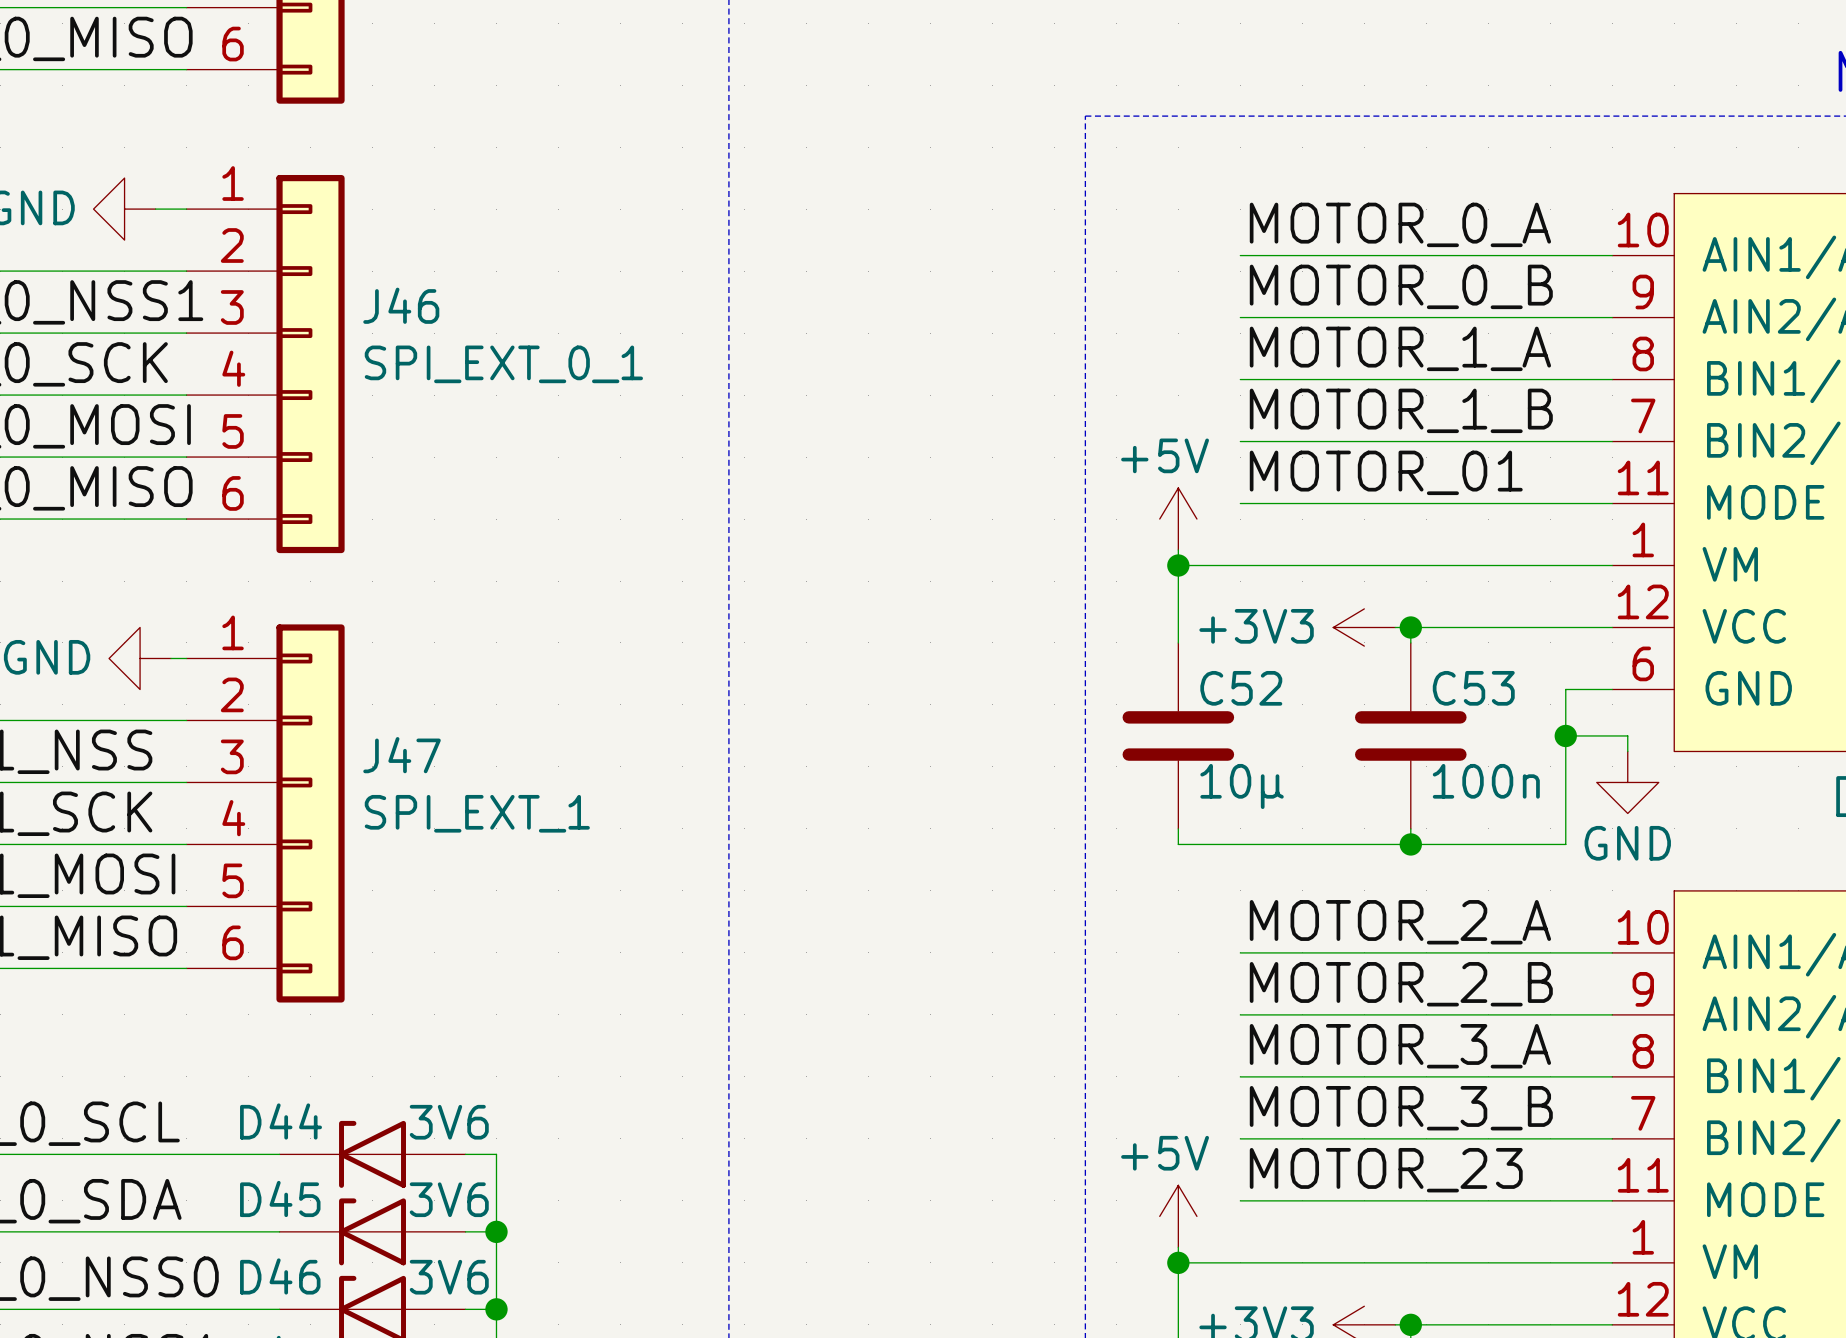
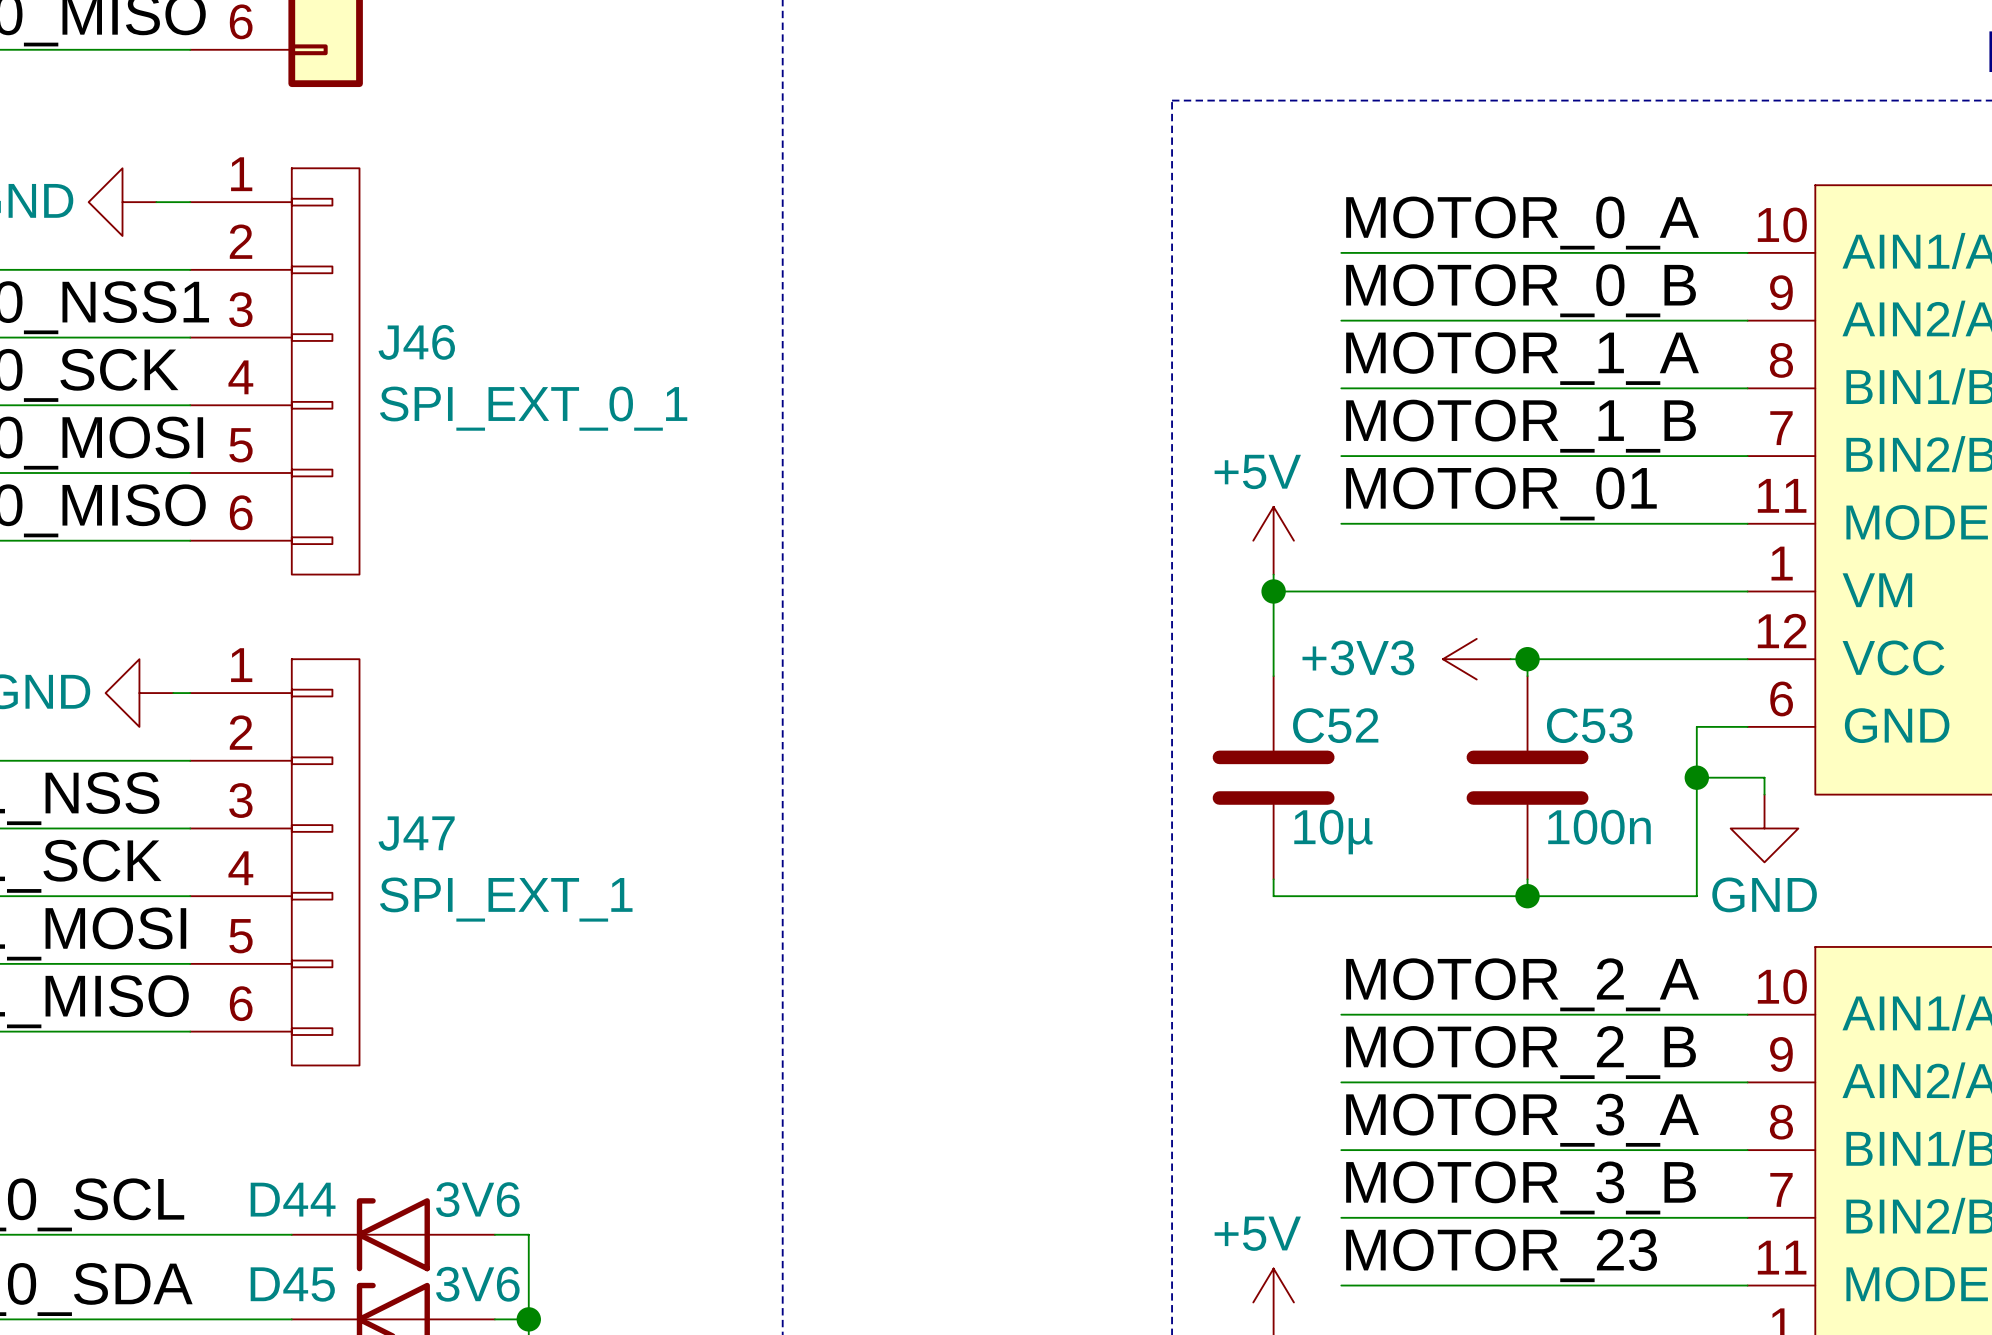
J46 symbol: [186, 174, 345, 554] -> [190, 168, 360, 575]
J47 symbol: [186, 624, 345, 1003] -> [190, 659, 360, 1066]

